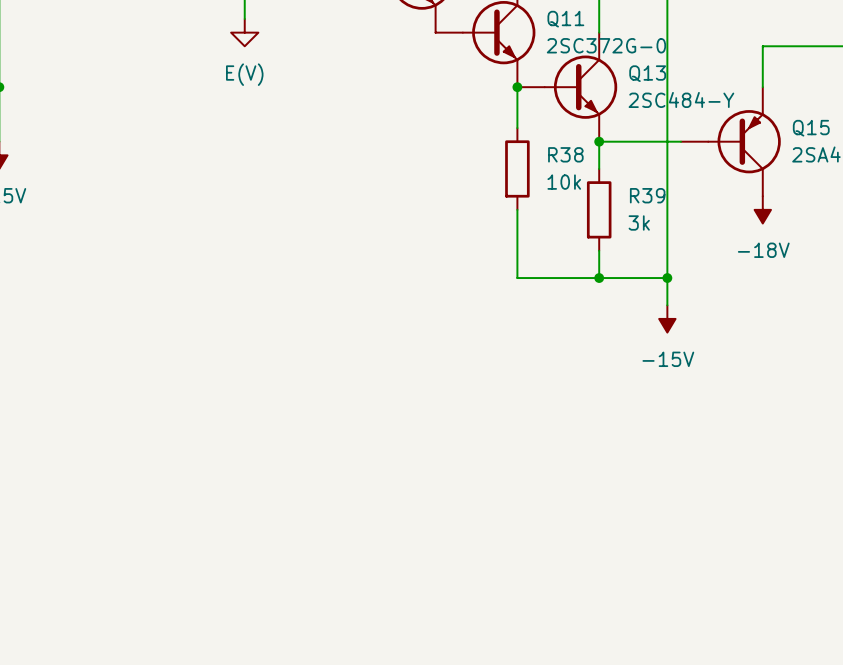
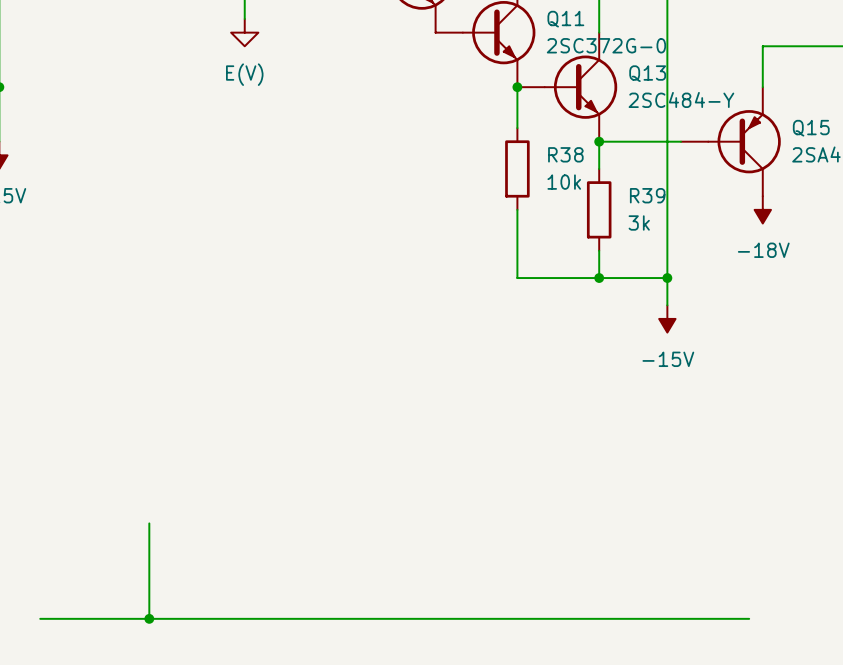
wire: none -> (149, 523) (149, 618)
wire: none -> (40, 618) (749, 618)
junction: none -> (149, 618)

